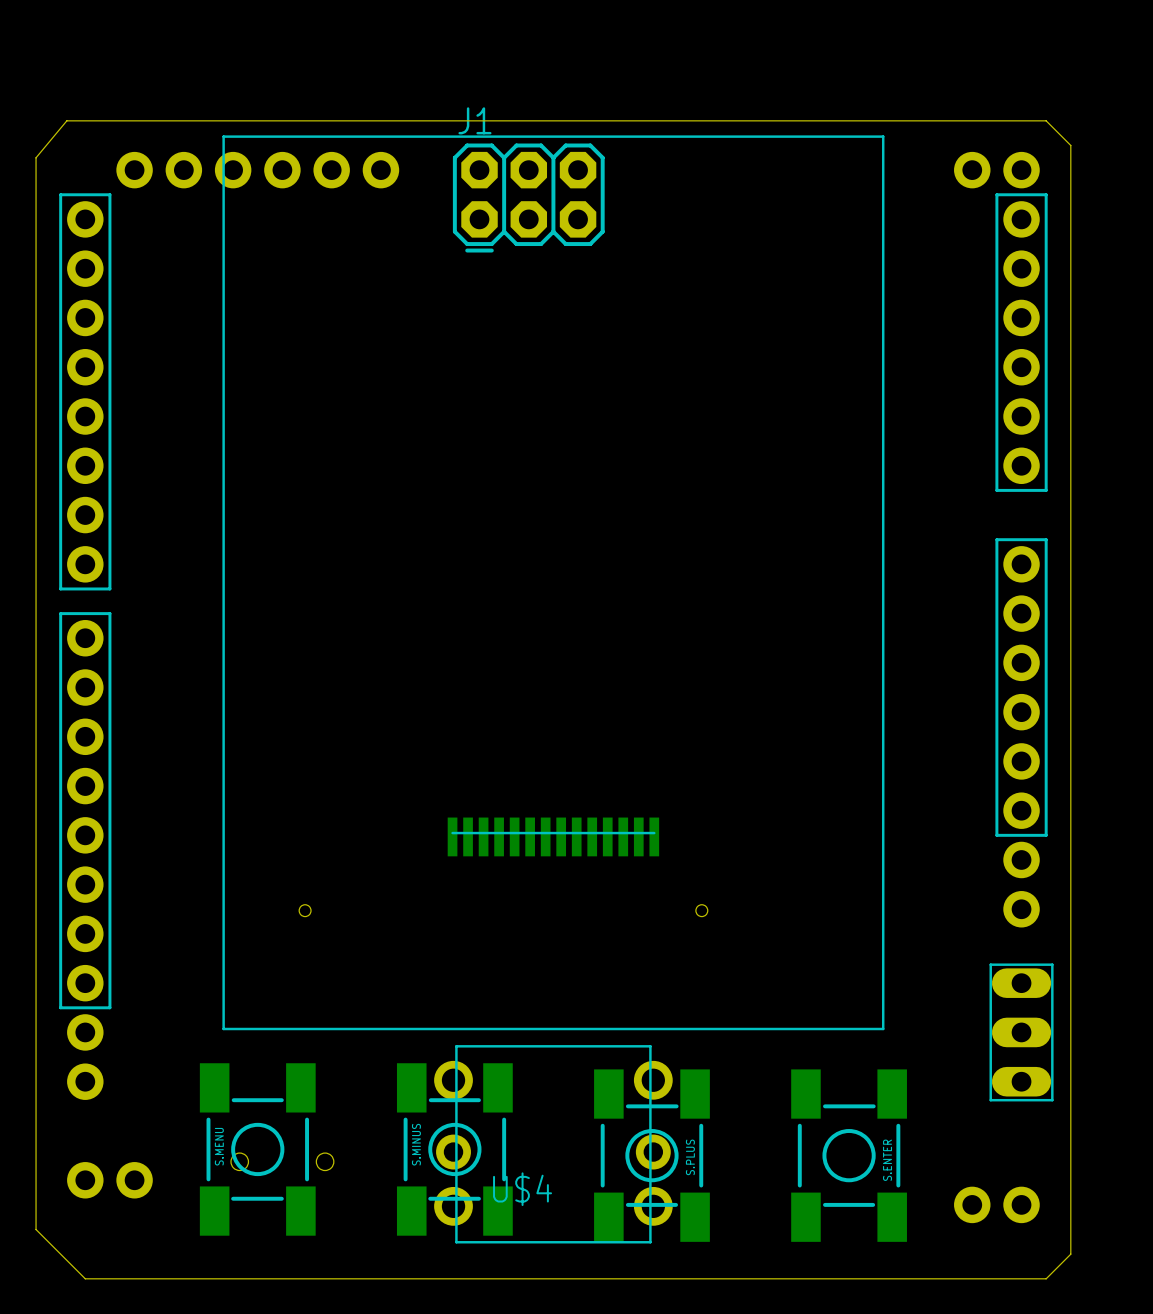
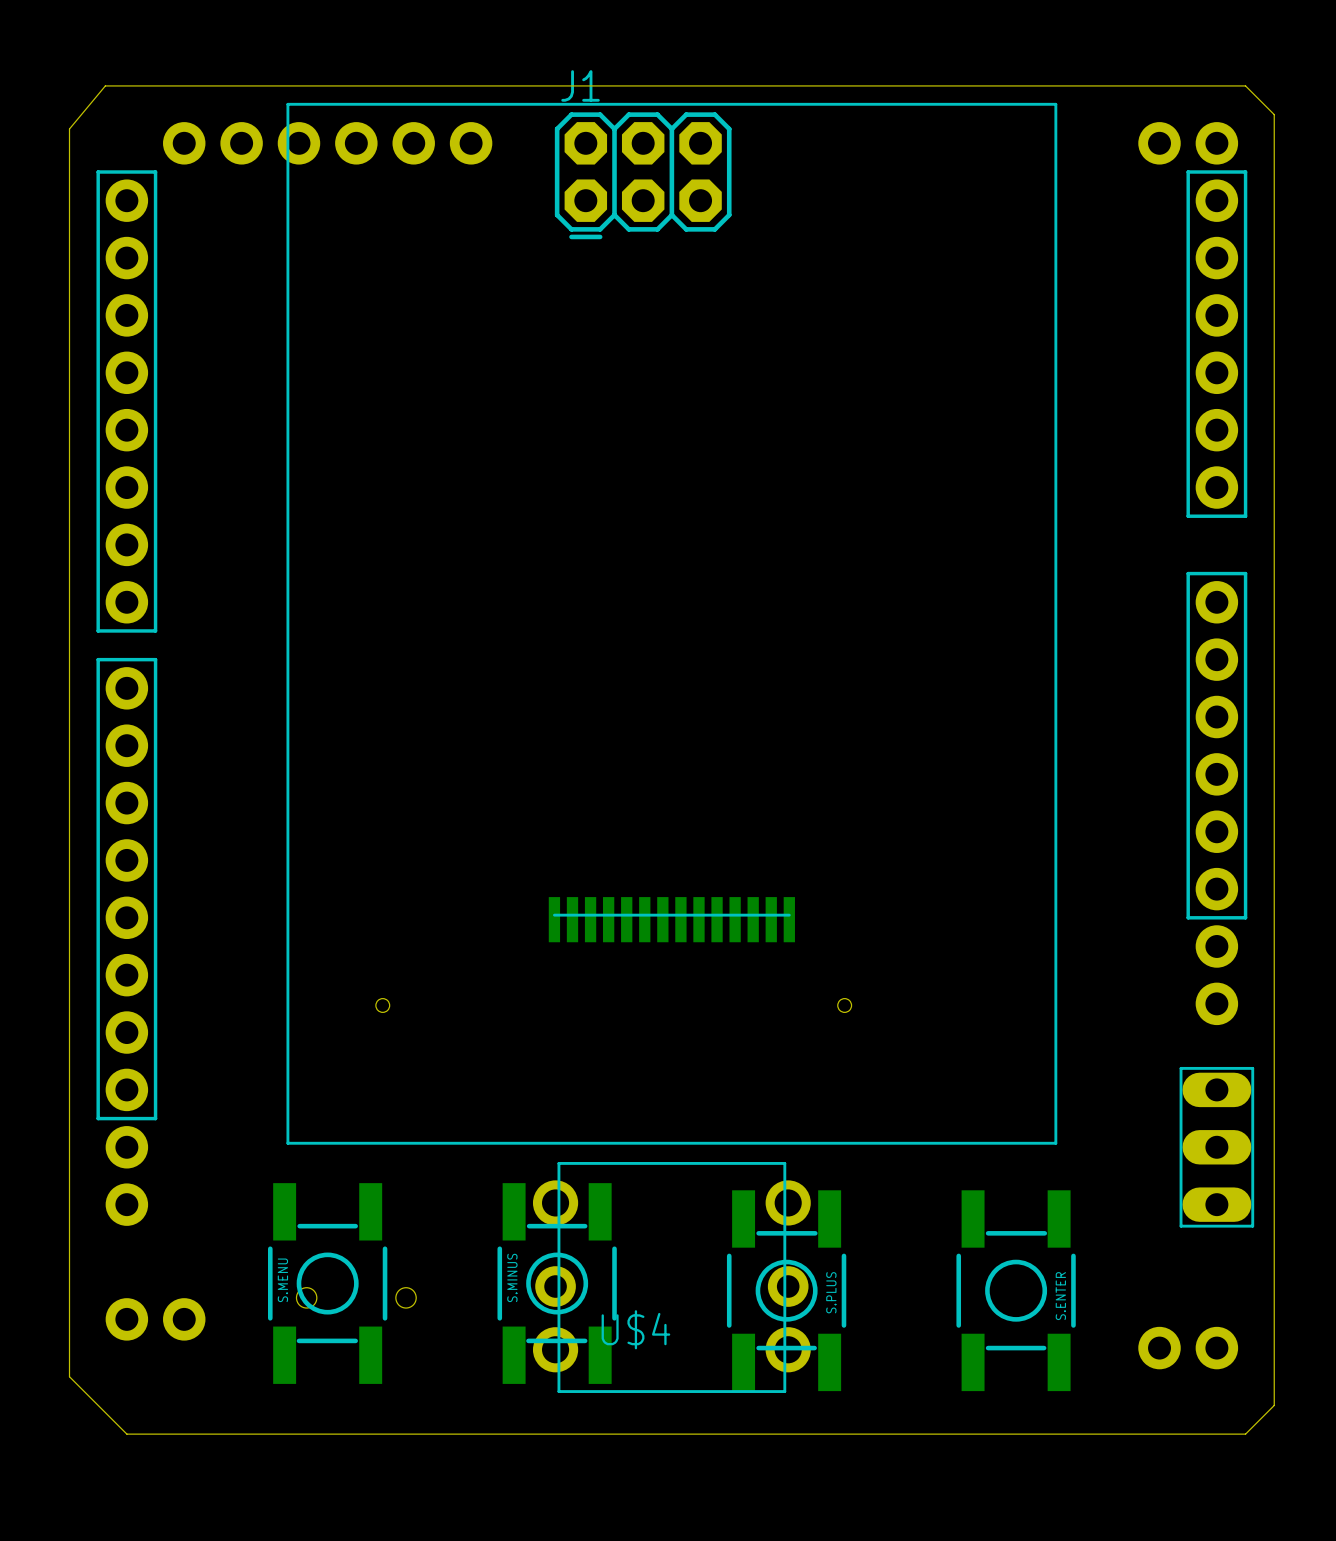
S.MENU footprint: [199, 1063, 316, 1236] -> [268, 1183, 388, 1384]
S.MINUS footprint: [396, 1063, 513, 1236] -> [497, 1183, 617, 1384]
S.PLUS footprint: [594, 1069, 710, 1242] -> [726, 1190, 847, 1392]
S.ENTER footprint: [791, 1069, 907, 1242] -> [956, 1190, 1076, 1392]

